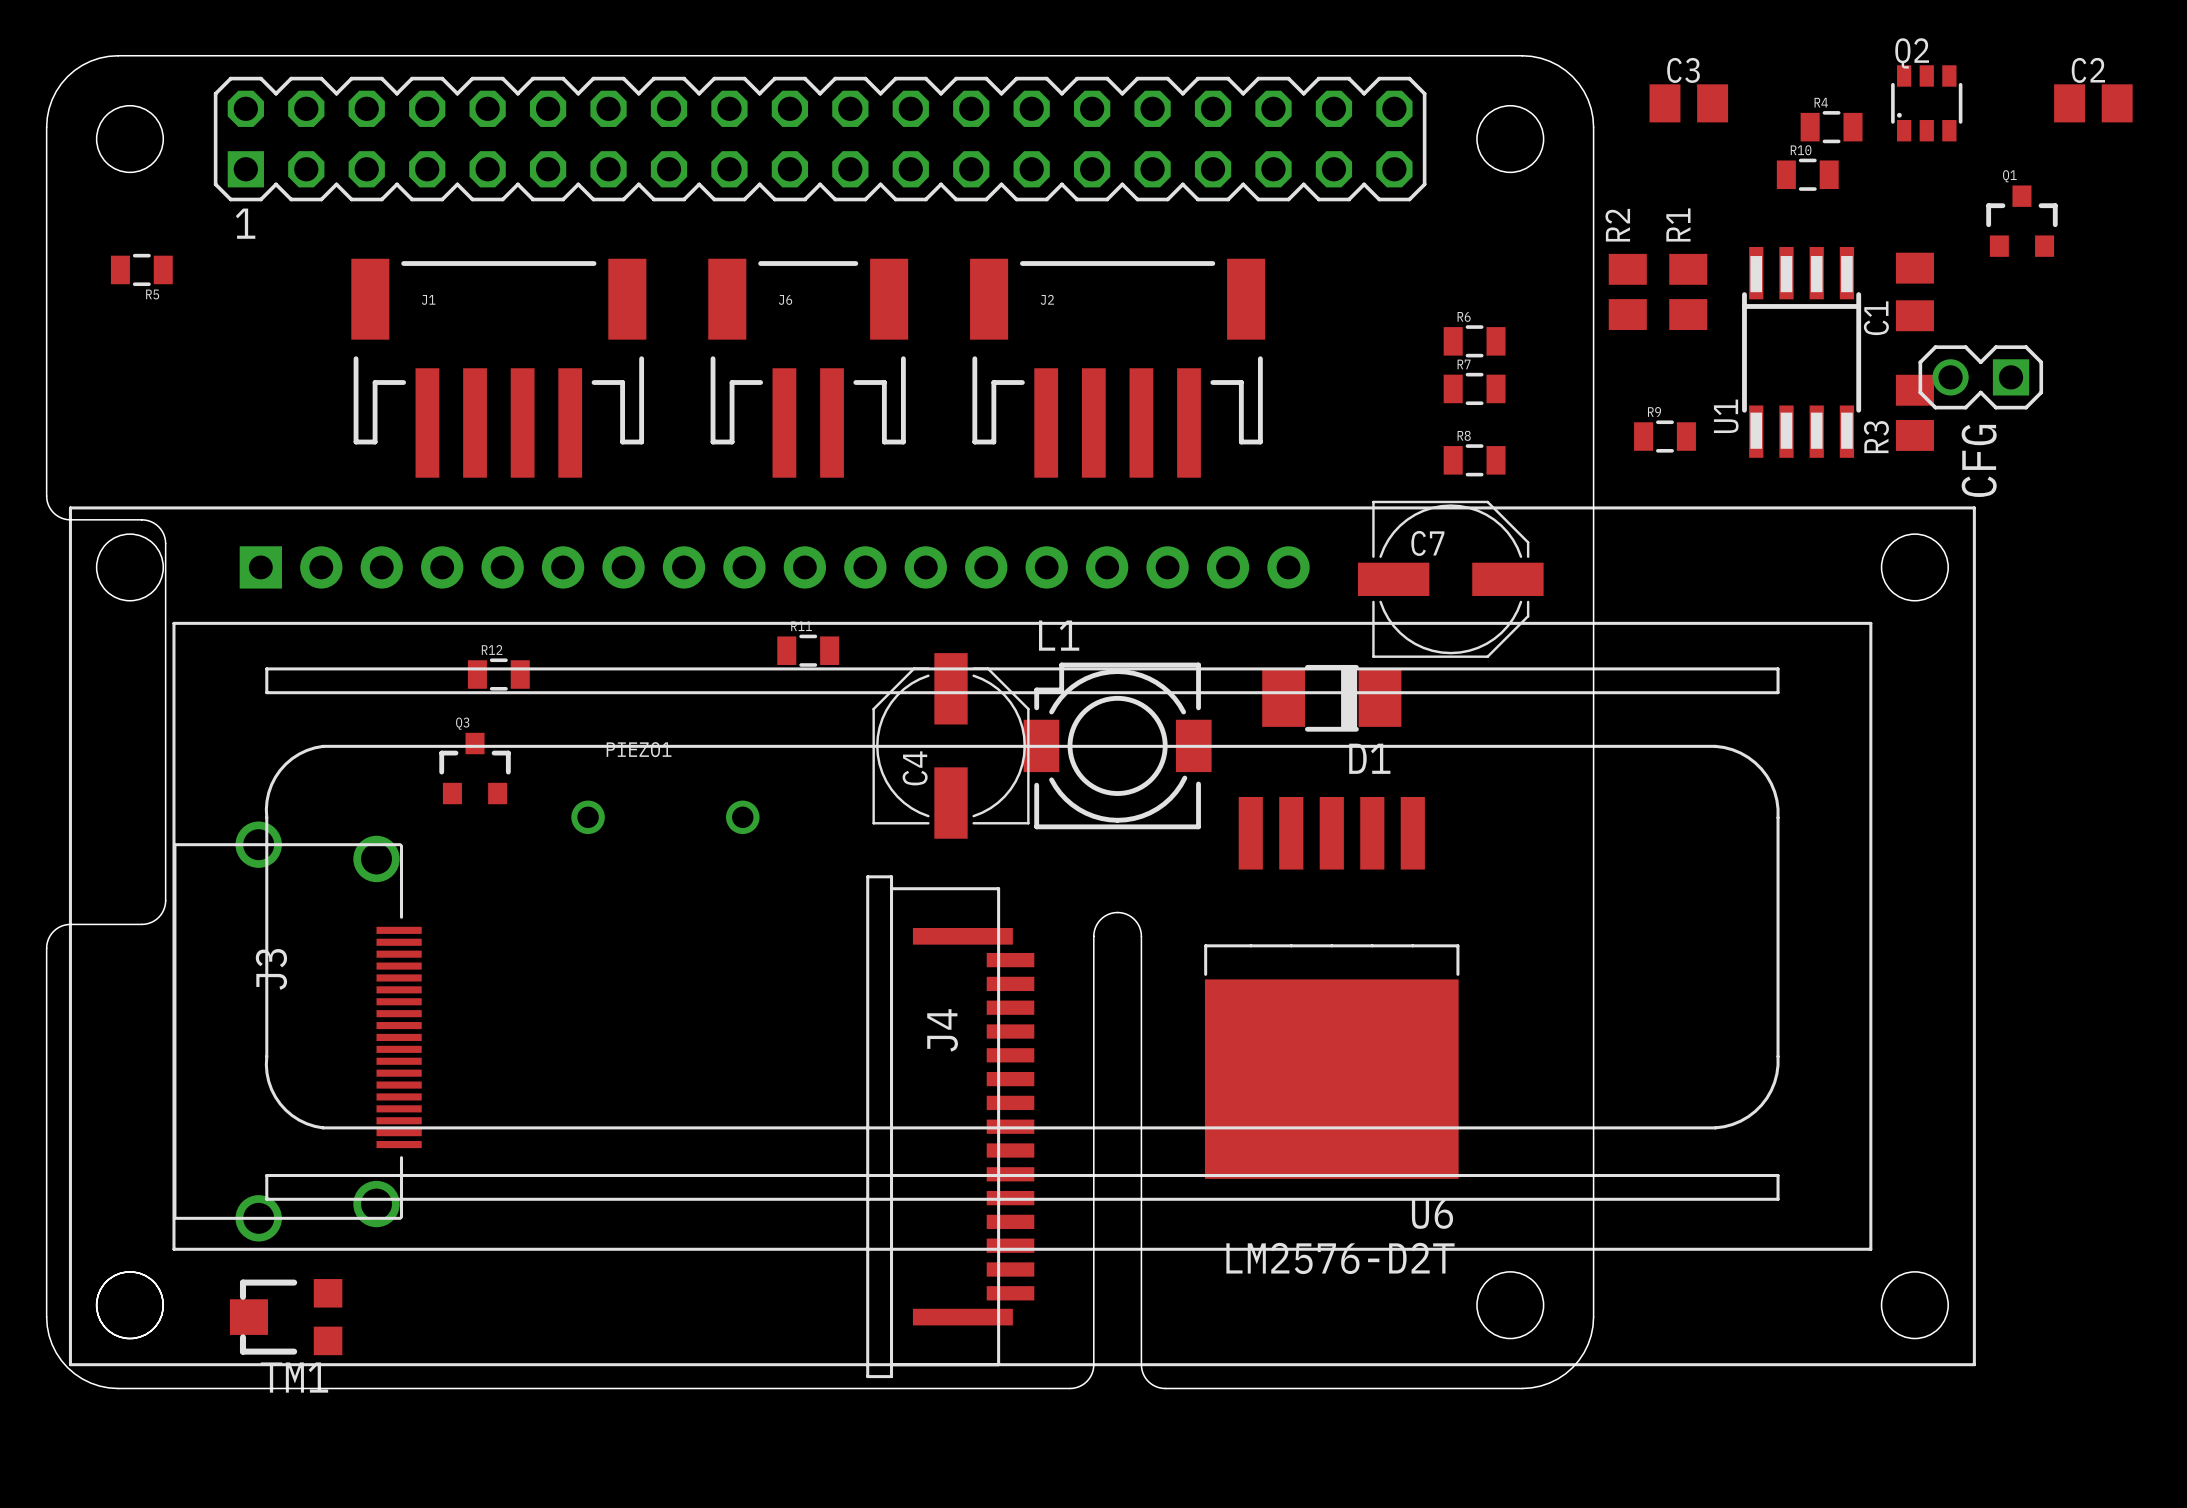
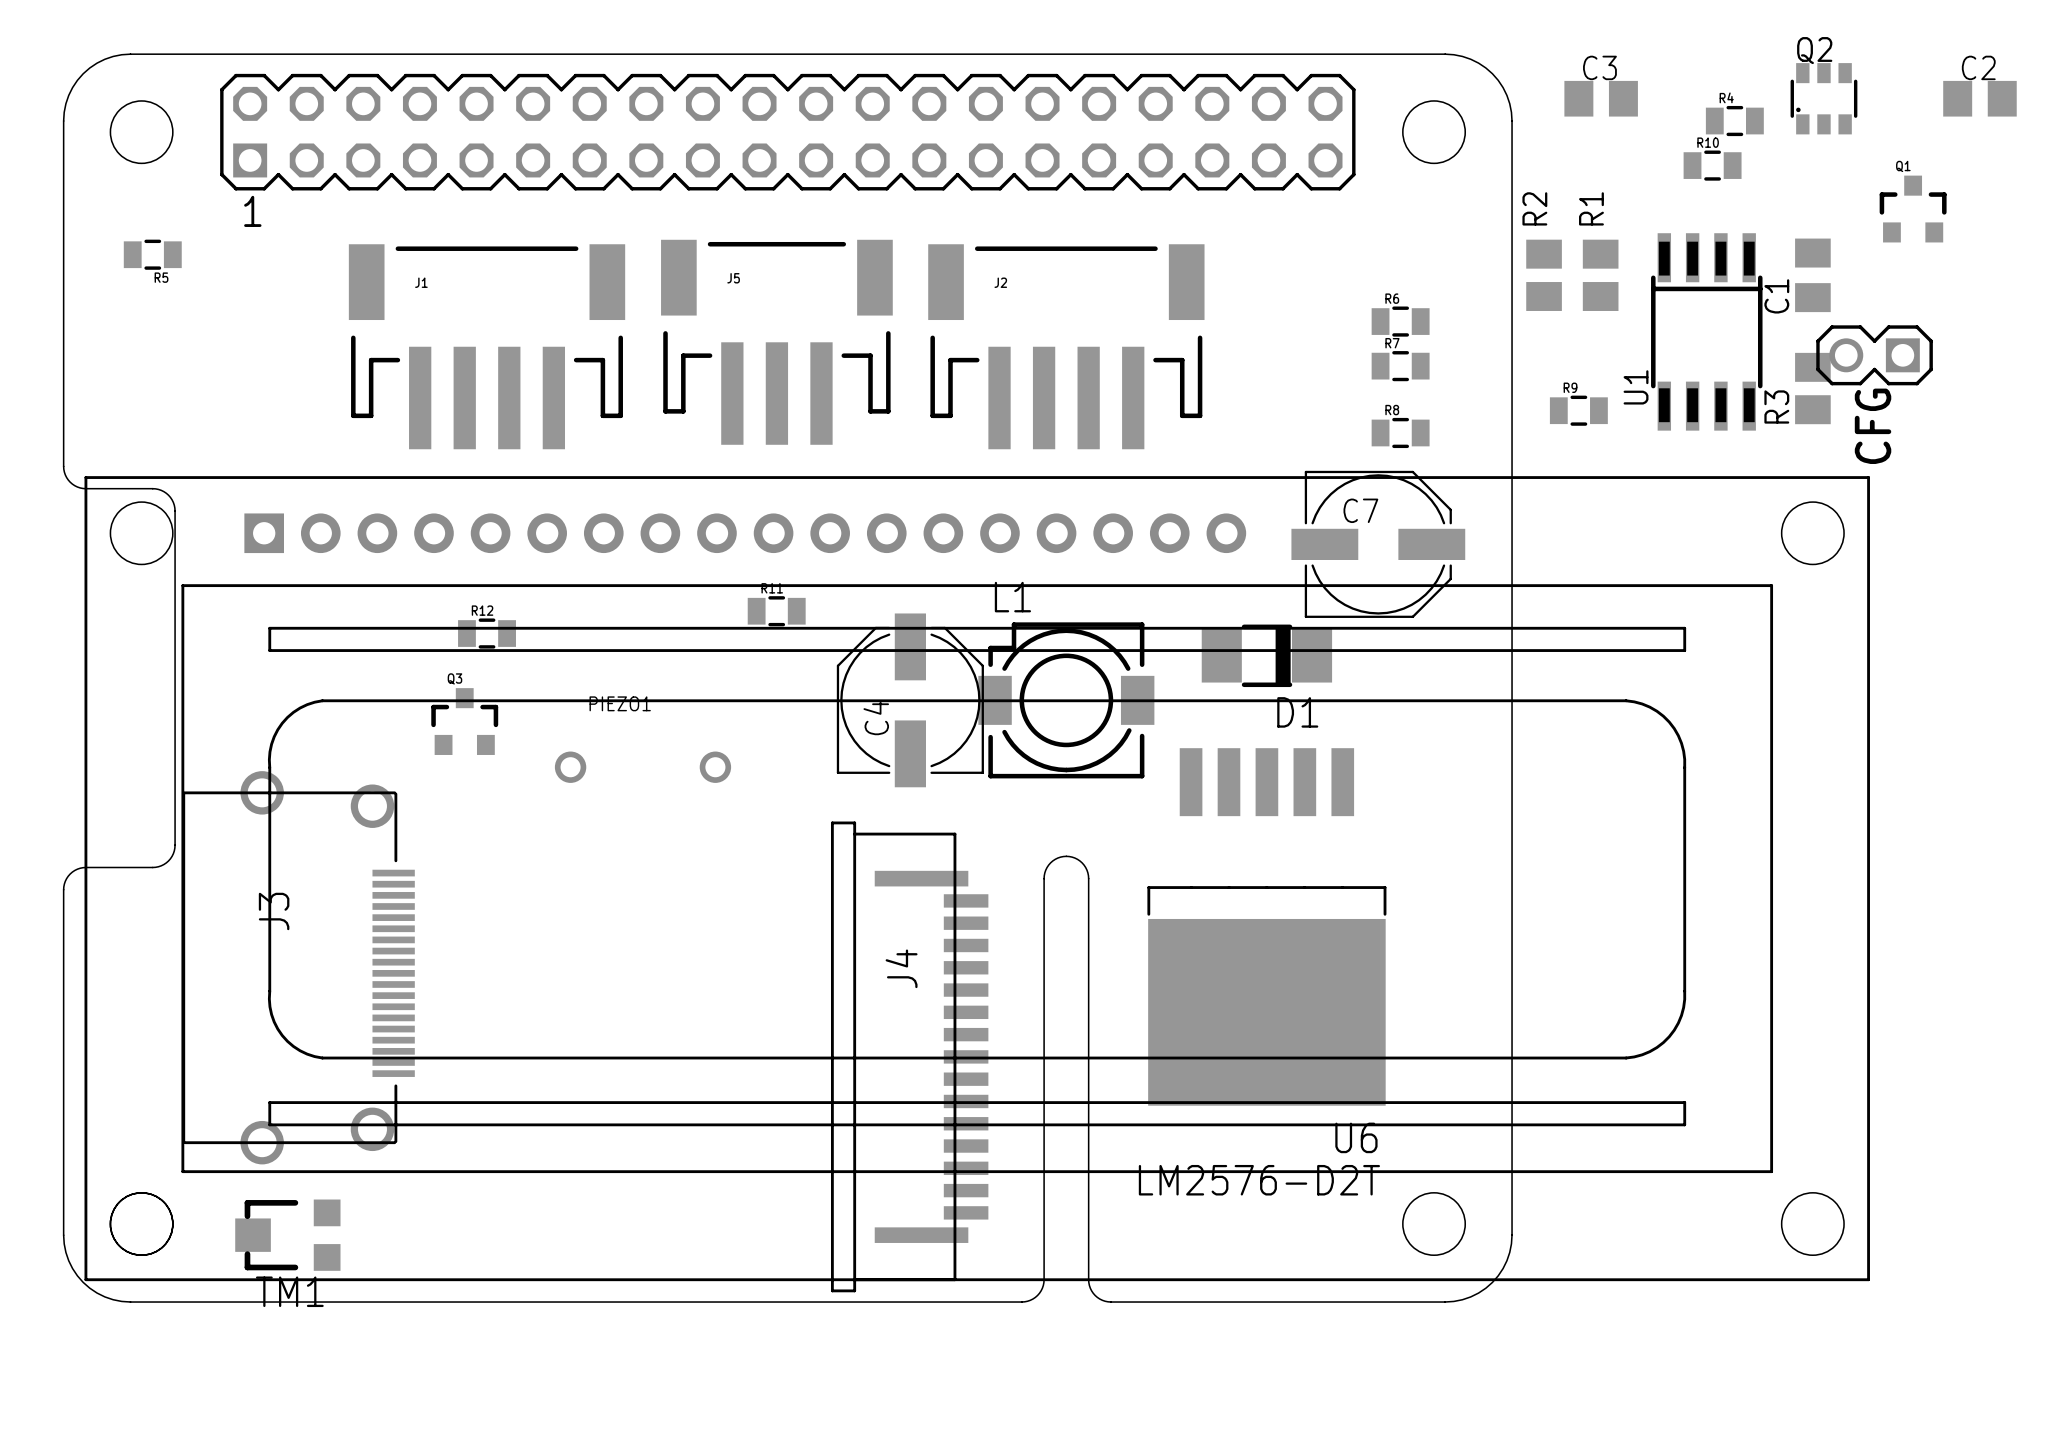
J5: none -> (776, 342)
J6: (808, 368) -> none

